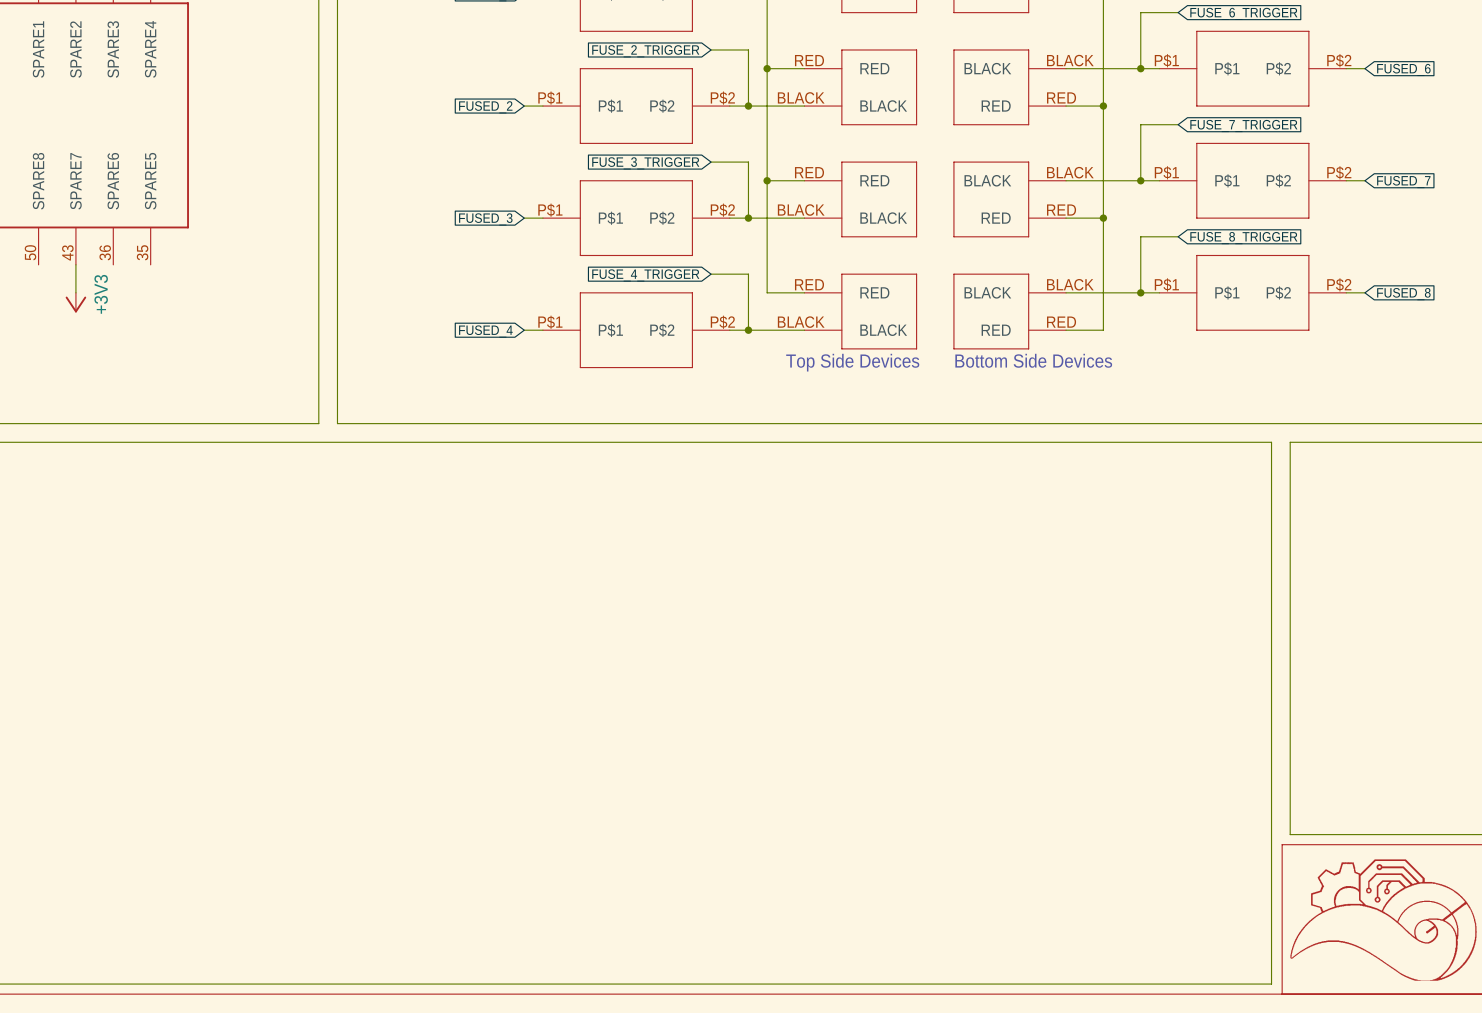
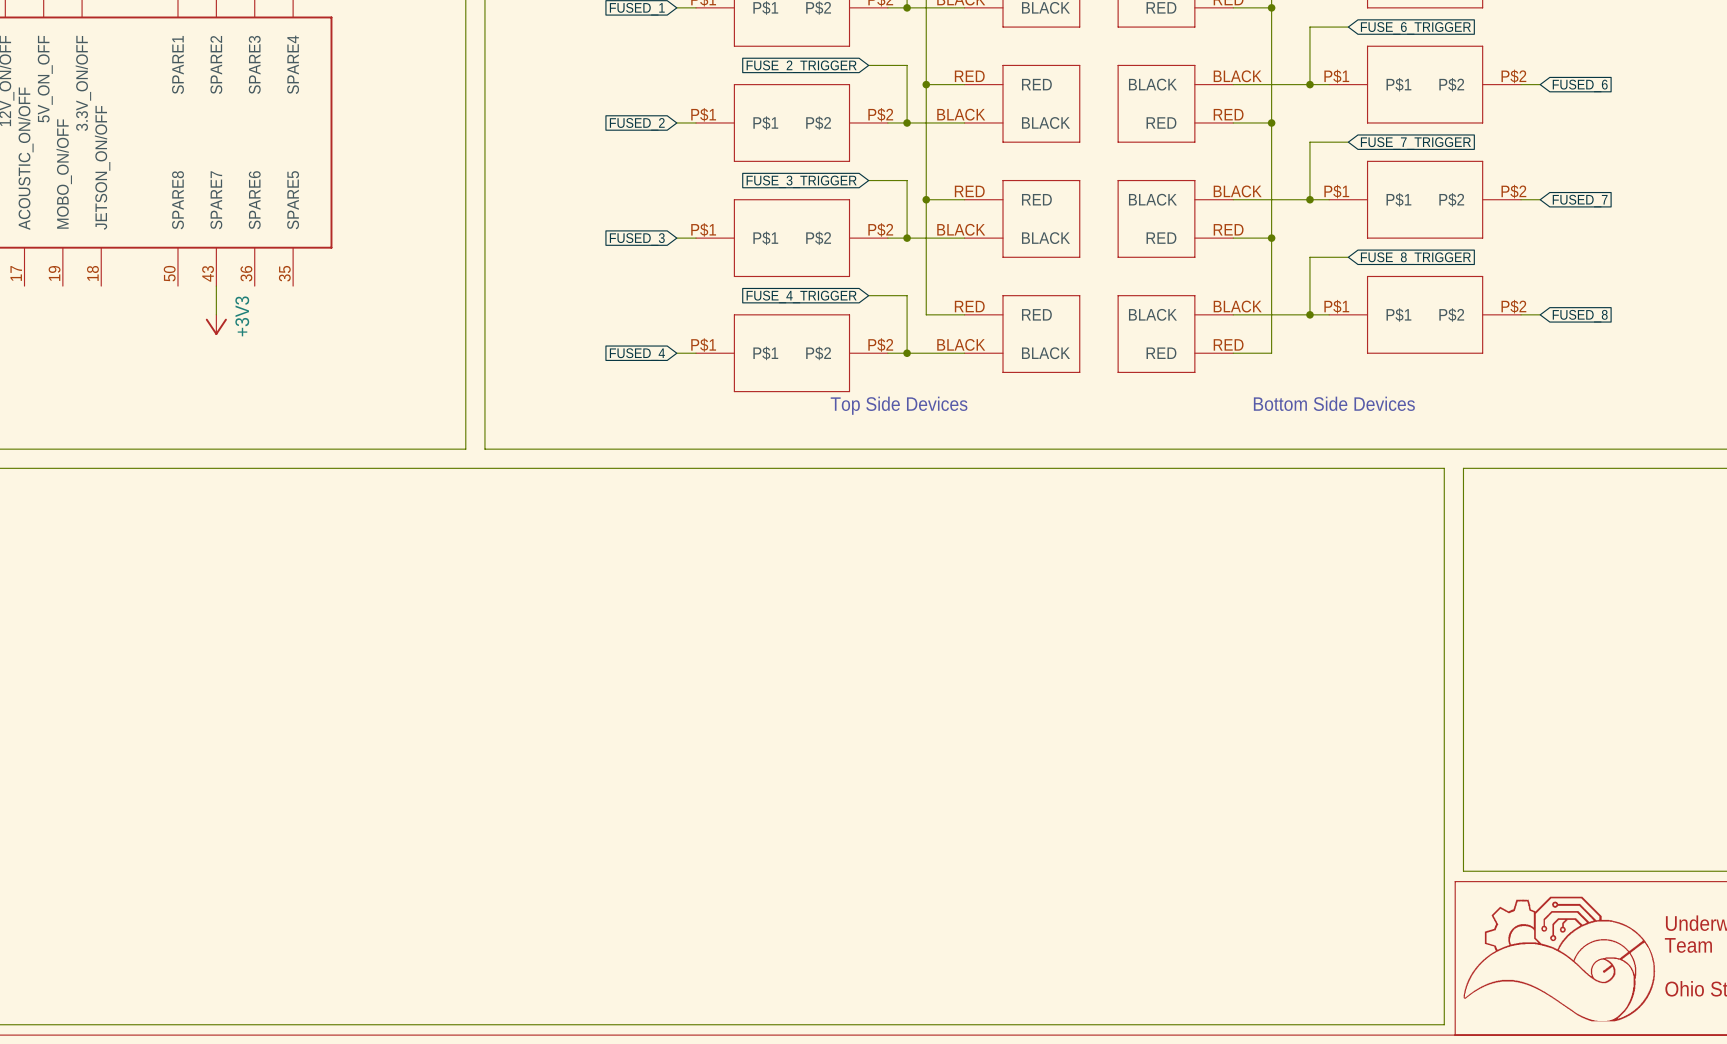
text position: Bottom Side Devices (1033, 360) -> Bottom Side Devices (1334, 403)
text position: Top Side Devices (852, 362) -> Top Side Devices (899, 405)

